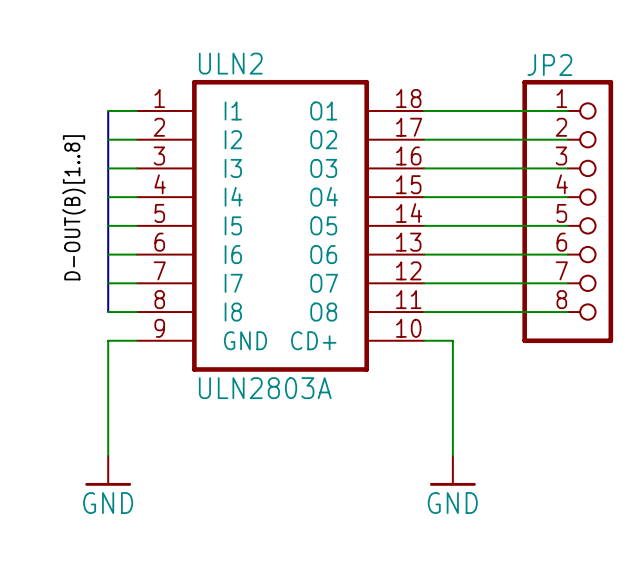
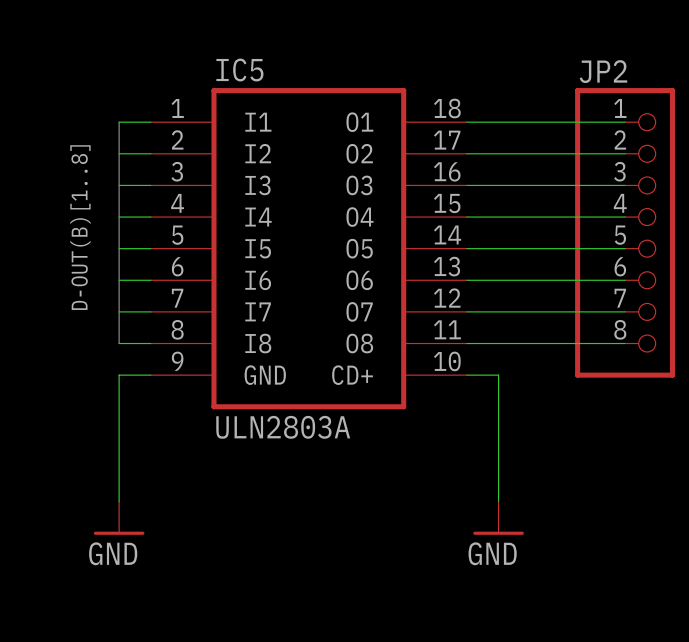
ULN2 name: ULN2 (230, 63) -> IC5 (239, 70)

